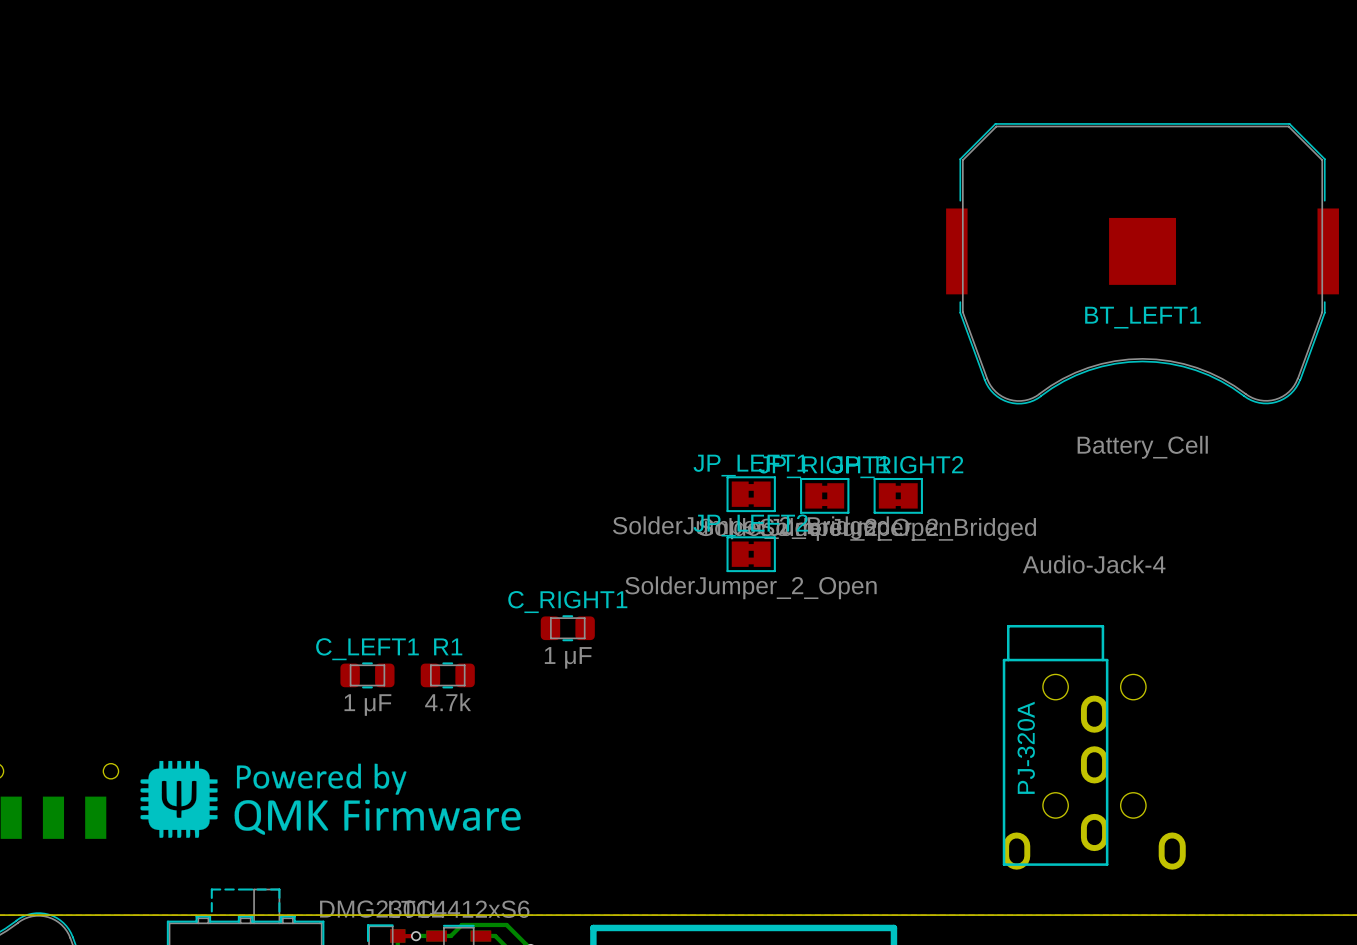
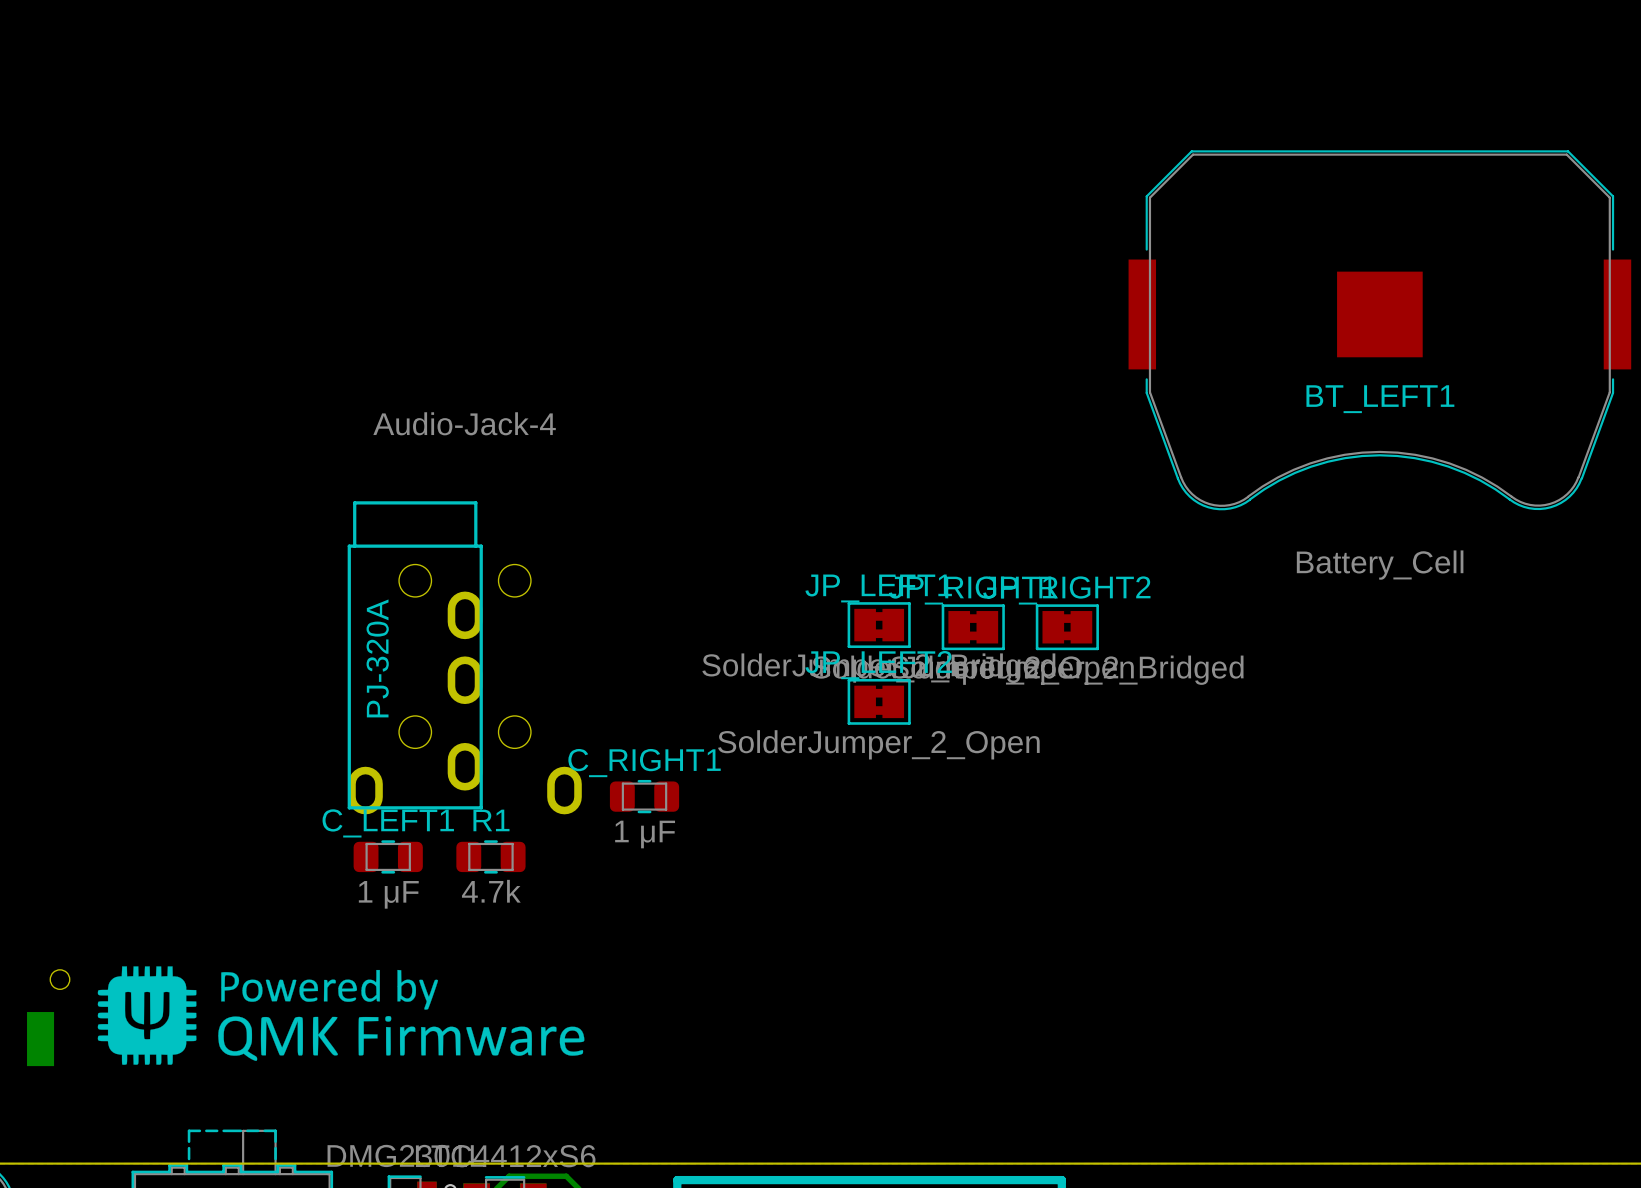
part: none -> Audio-Jack-4 (464, 657)
part: Audio-Jack-4 (1094, 747) -> none

